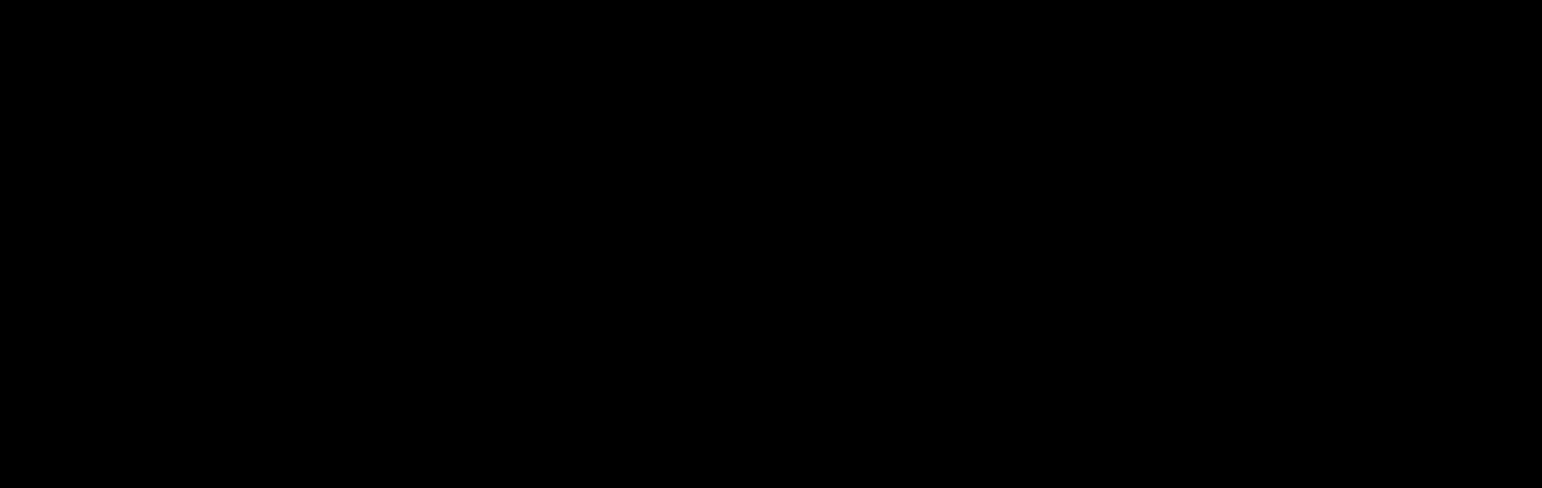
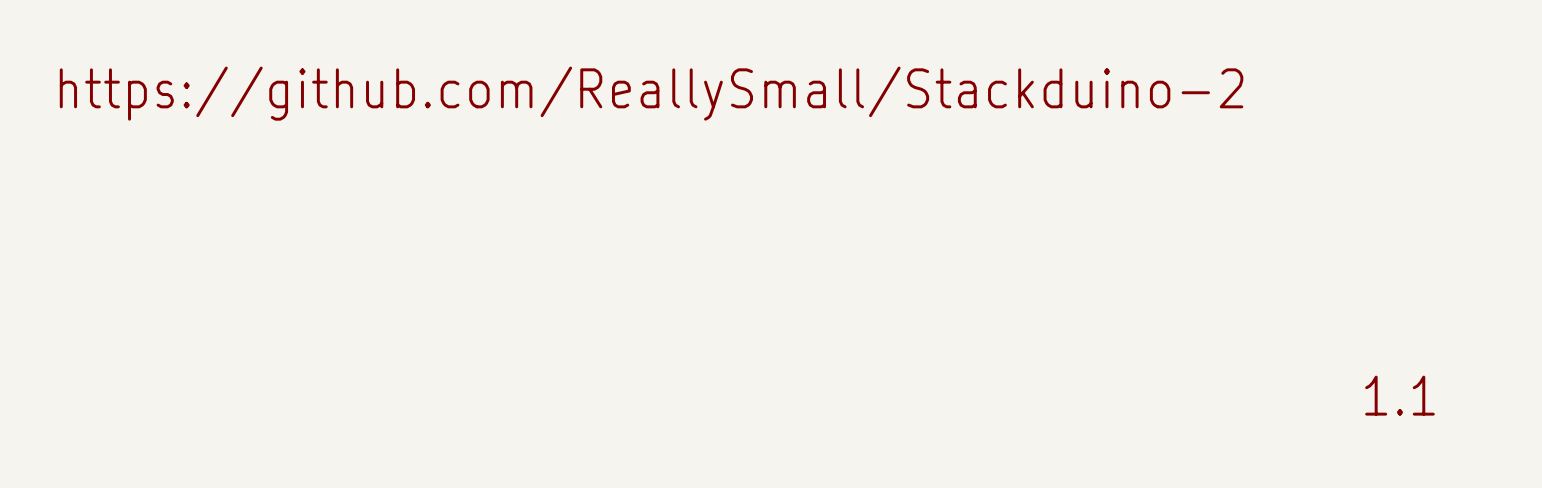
text: none -> https://github.com/ReallySmall/Stackduino-2 (651, 93)
text: none -> 1.1 (1399, 395)

